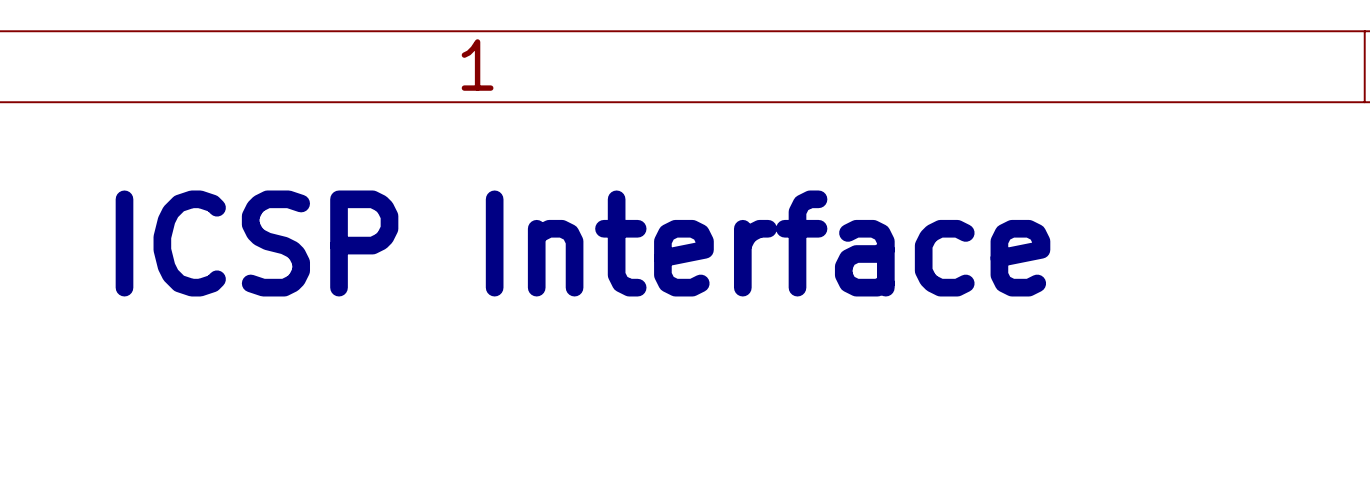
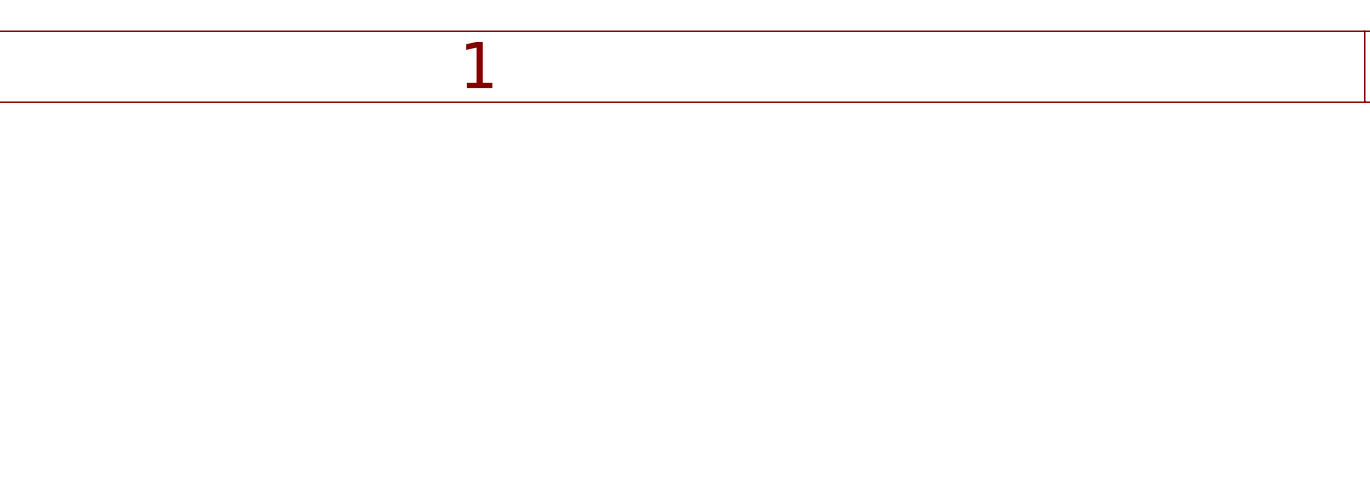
text: ICSP Interface (582, 243) -> none

